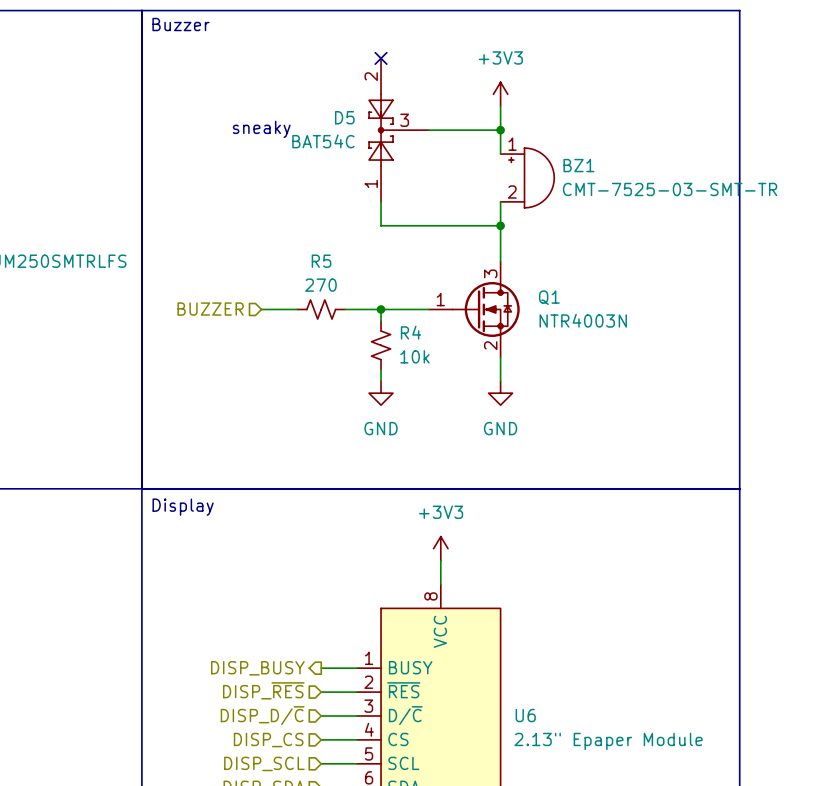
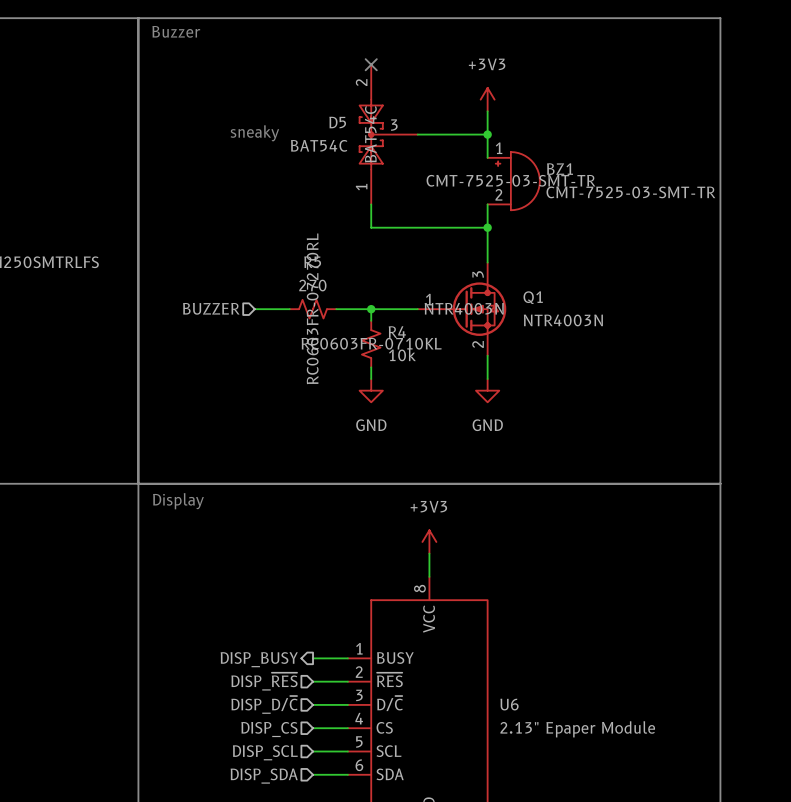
D5 text: none -> BAT54C (370, 134)
BZ1 text: none -> CMT-7525-03-SMT-TR (510, 180)
R5 text: none -> RC0603FR-07270RL (312, 308)
Q1 text: none -> NTR4003N (464, 308)
R4 text: none -> RC0603FR-0710KL (371, 343)

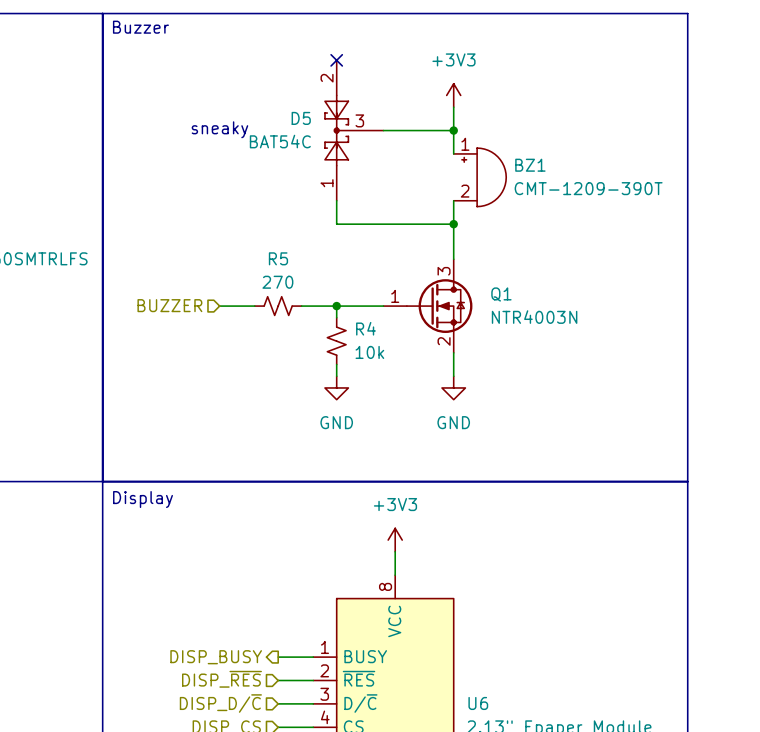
D5 text: BAT54C (370, 134) -> none
BZ1 text: CMT-7525-03-SMT-TR (510, 180) -> none
BZ1 value: CMT-7525-03-SMT-TR (630, 192) -> CMT-1209-390T (588, 188)
R5 text: RC0603FR-07270RL (312, 308) -> none
Q1 text: NTR4003N (464, 308) -> none
R4 text: RC0603FR-0710KL (371, 343) -> none

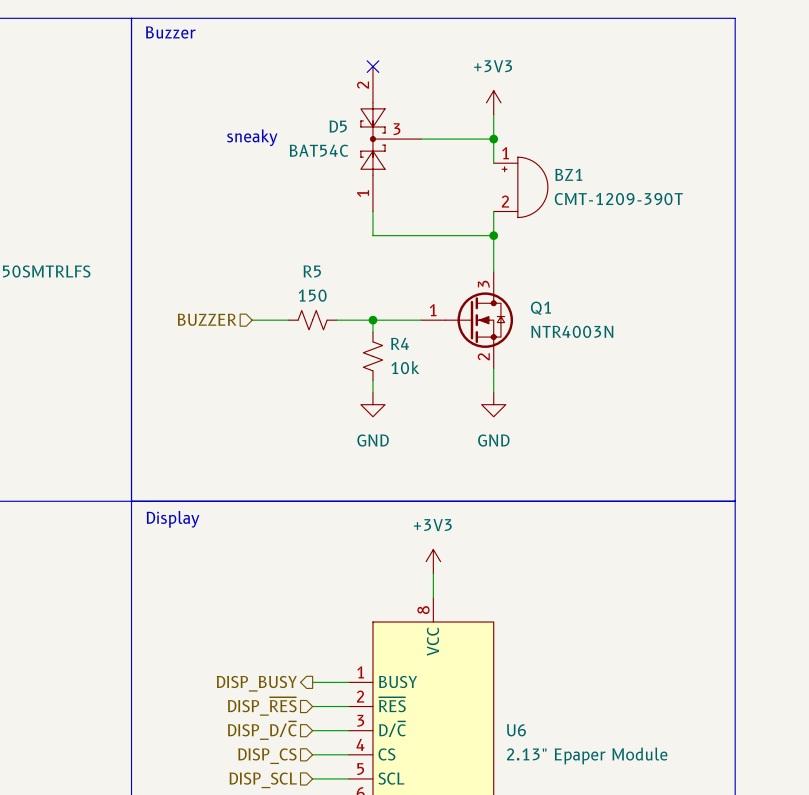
R5 value: 270 (277, 282) -> 150 (312, 295)

